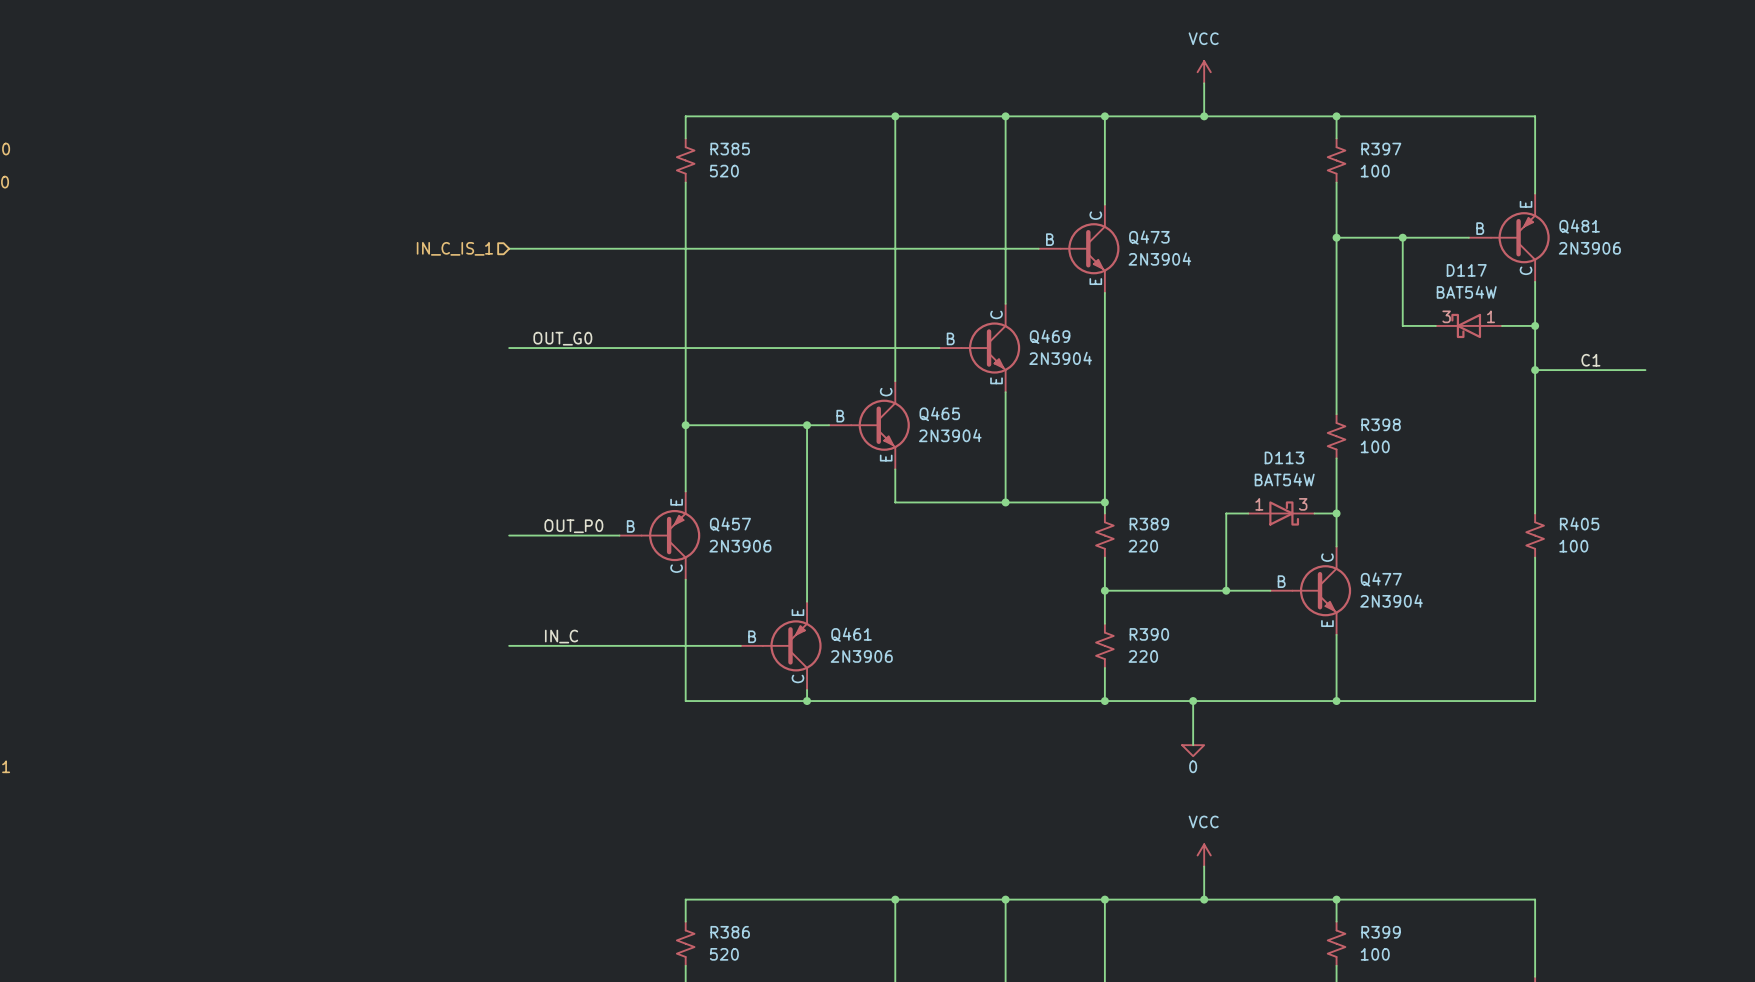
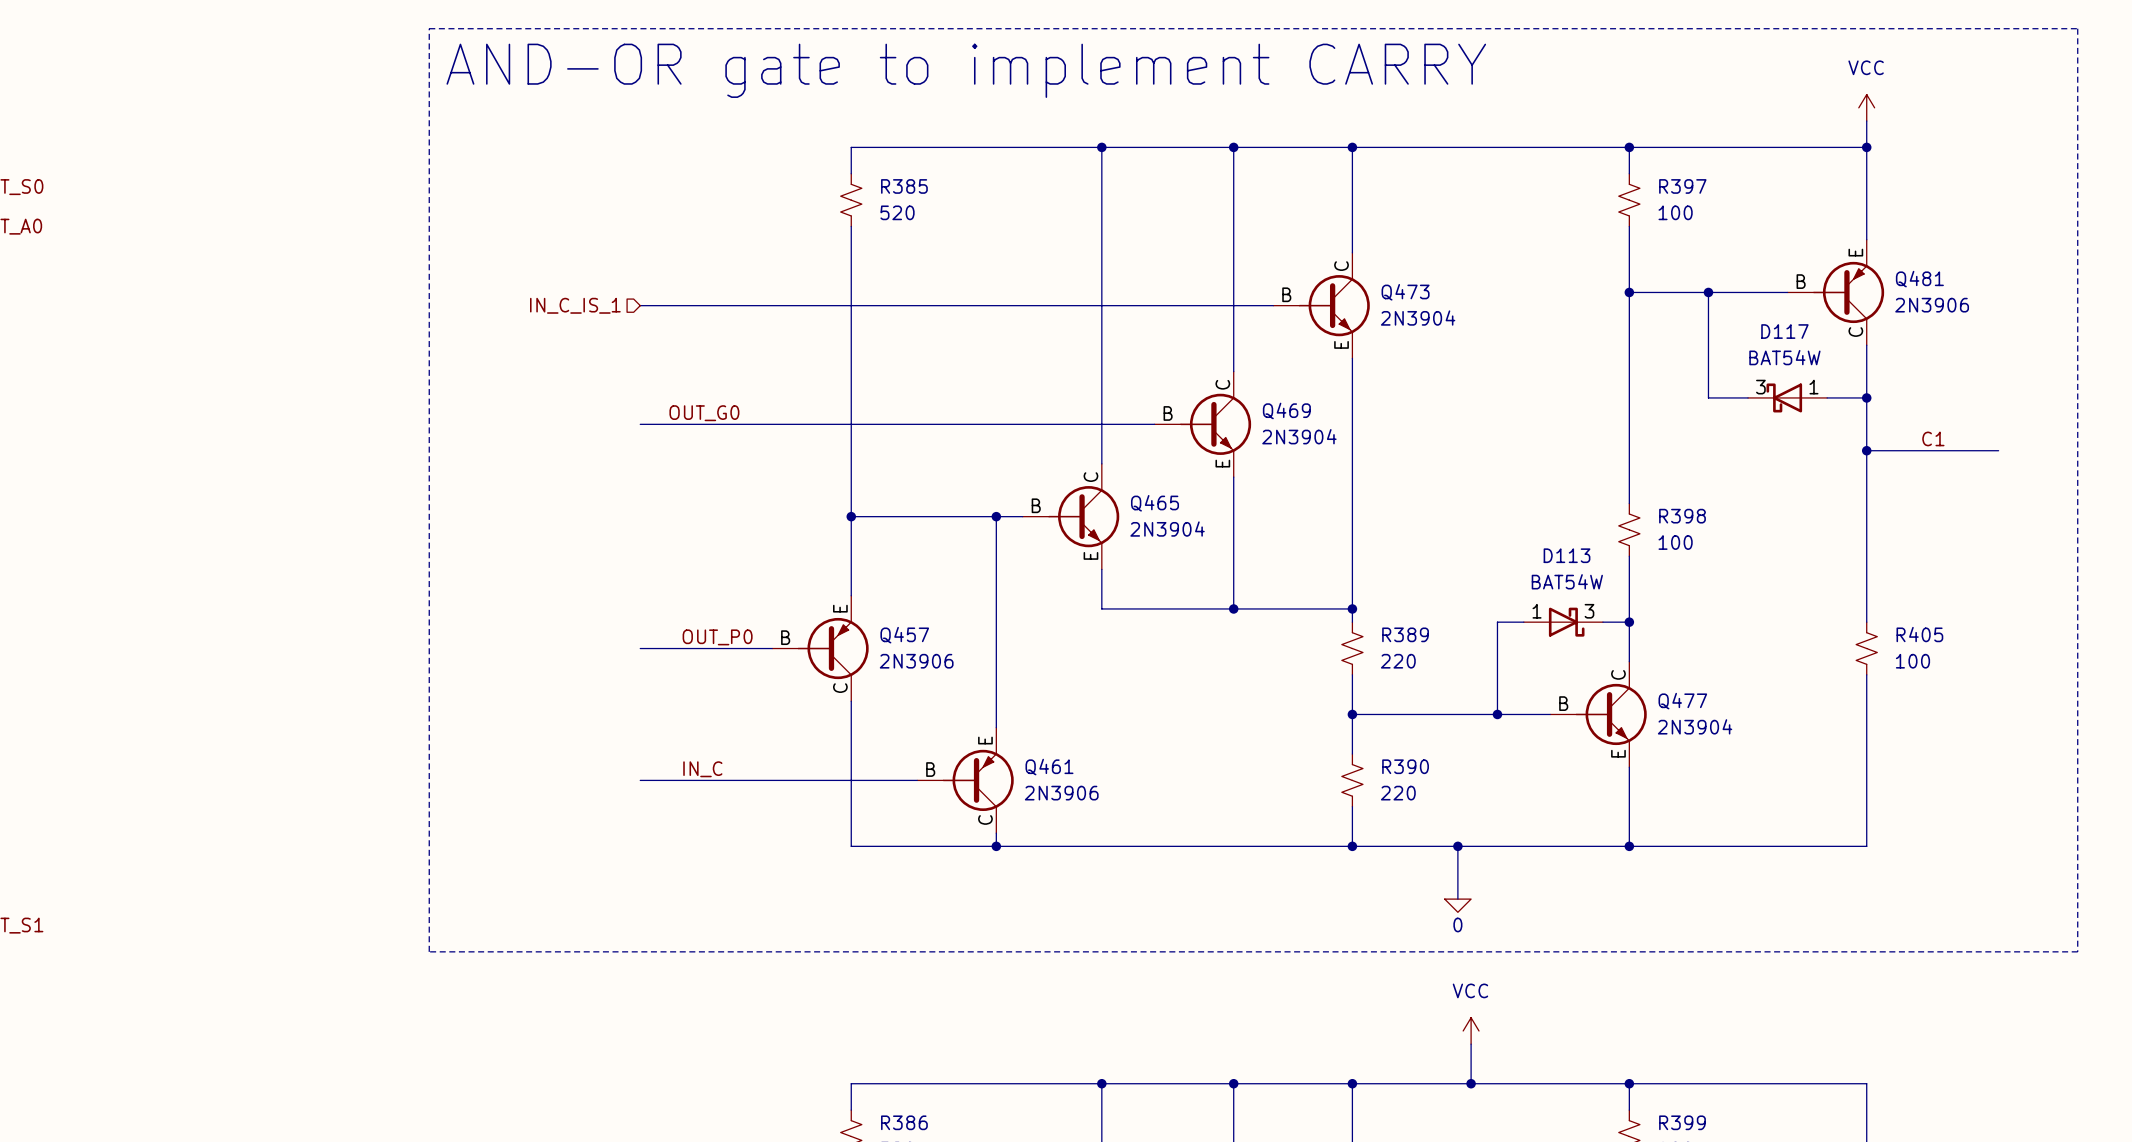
line: none -> (429, 28) (2077, 28) (2077, 951) (429, 951) (429, 28)
text: none -> AND-OR gate to implement CARRY (966, 70)
power symbol: VCC (1204, 72) -> none
wire: (1204, 83) (1204, 116) -> none
power symbol: none -> VCC (1866, 107)
wire: none -> (1866, 121) (1866, 147)
junction: (1204, 116) -> none
junction: none -> (1866, 147)

